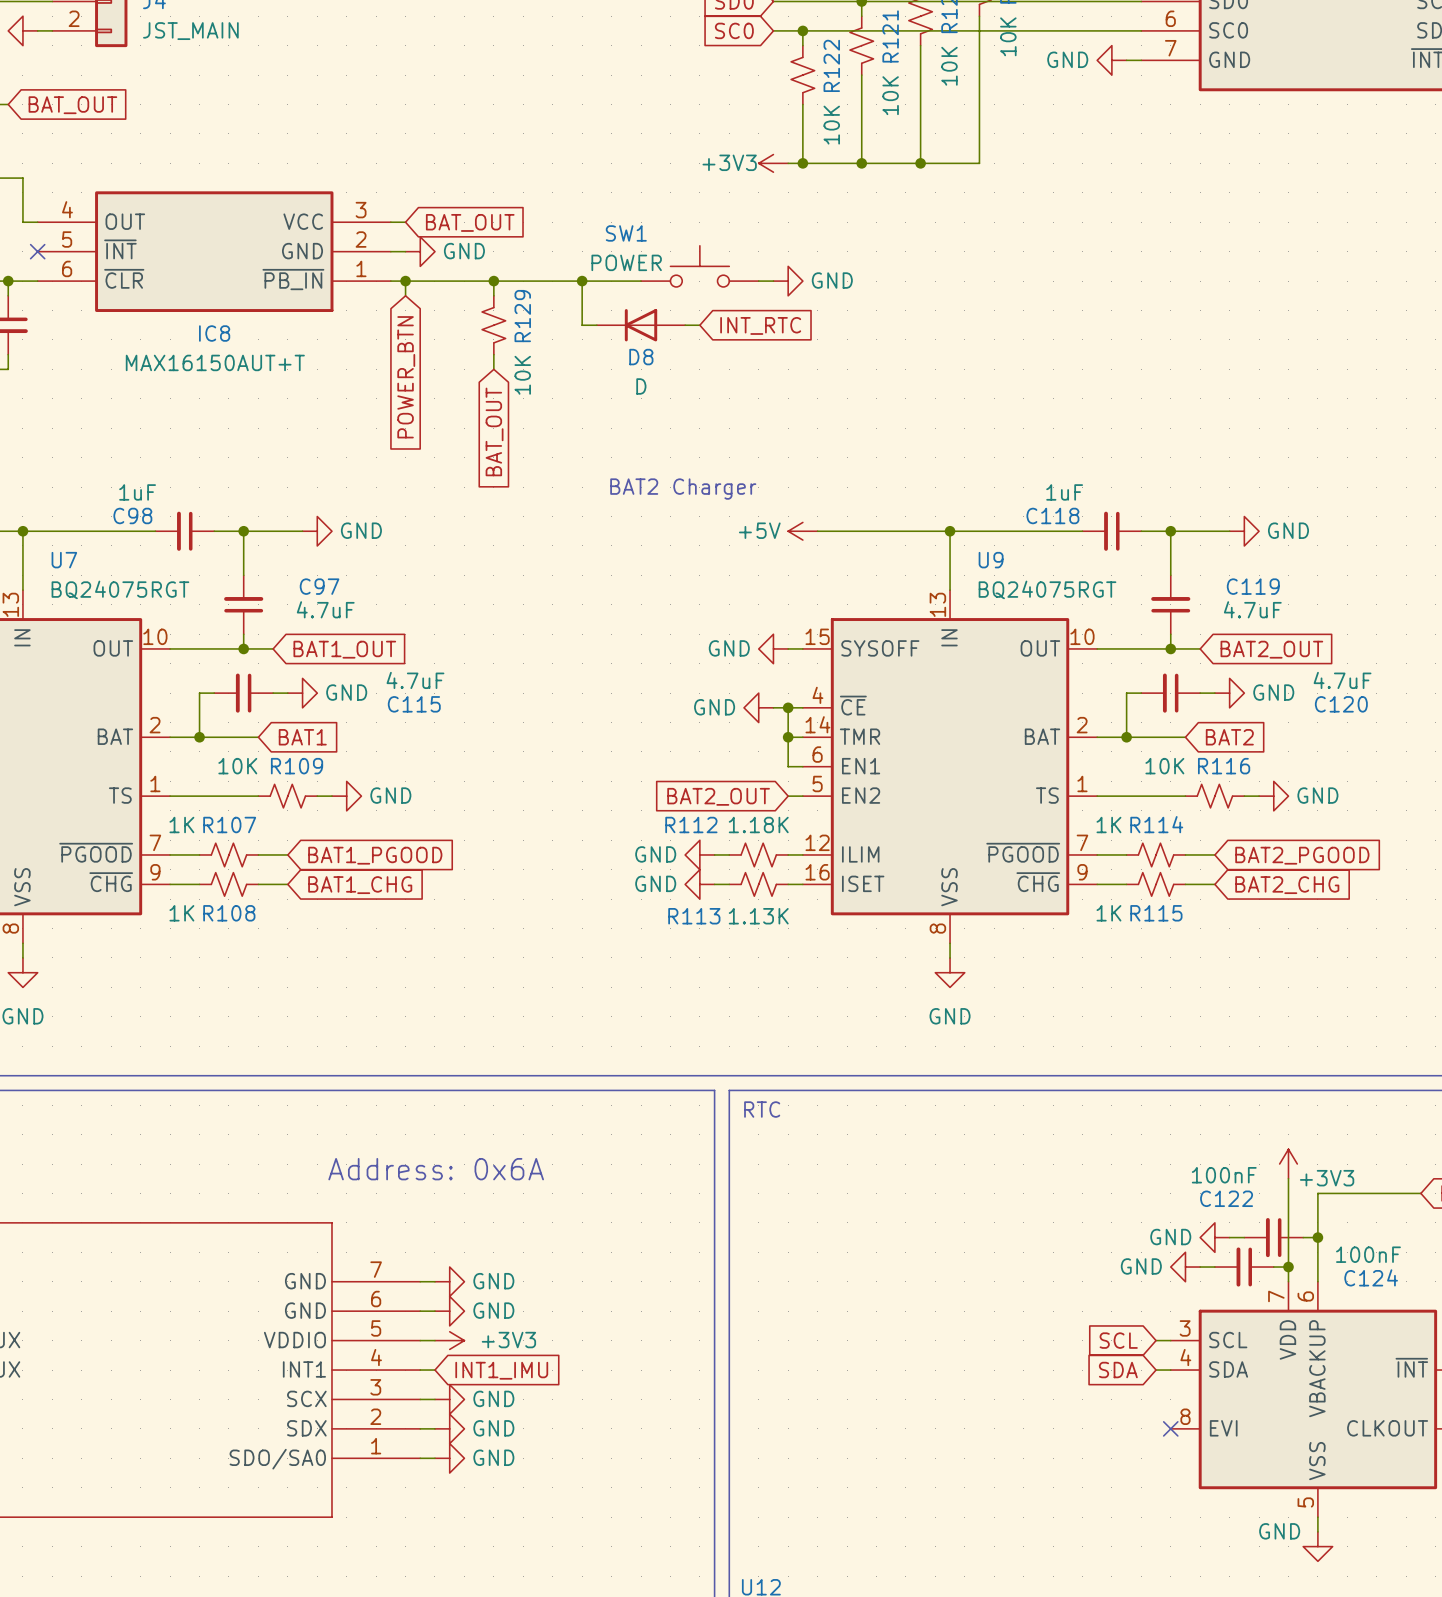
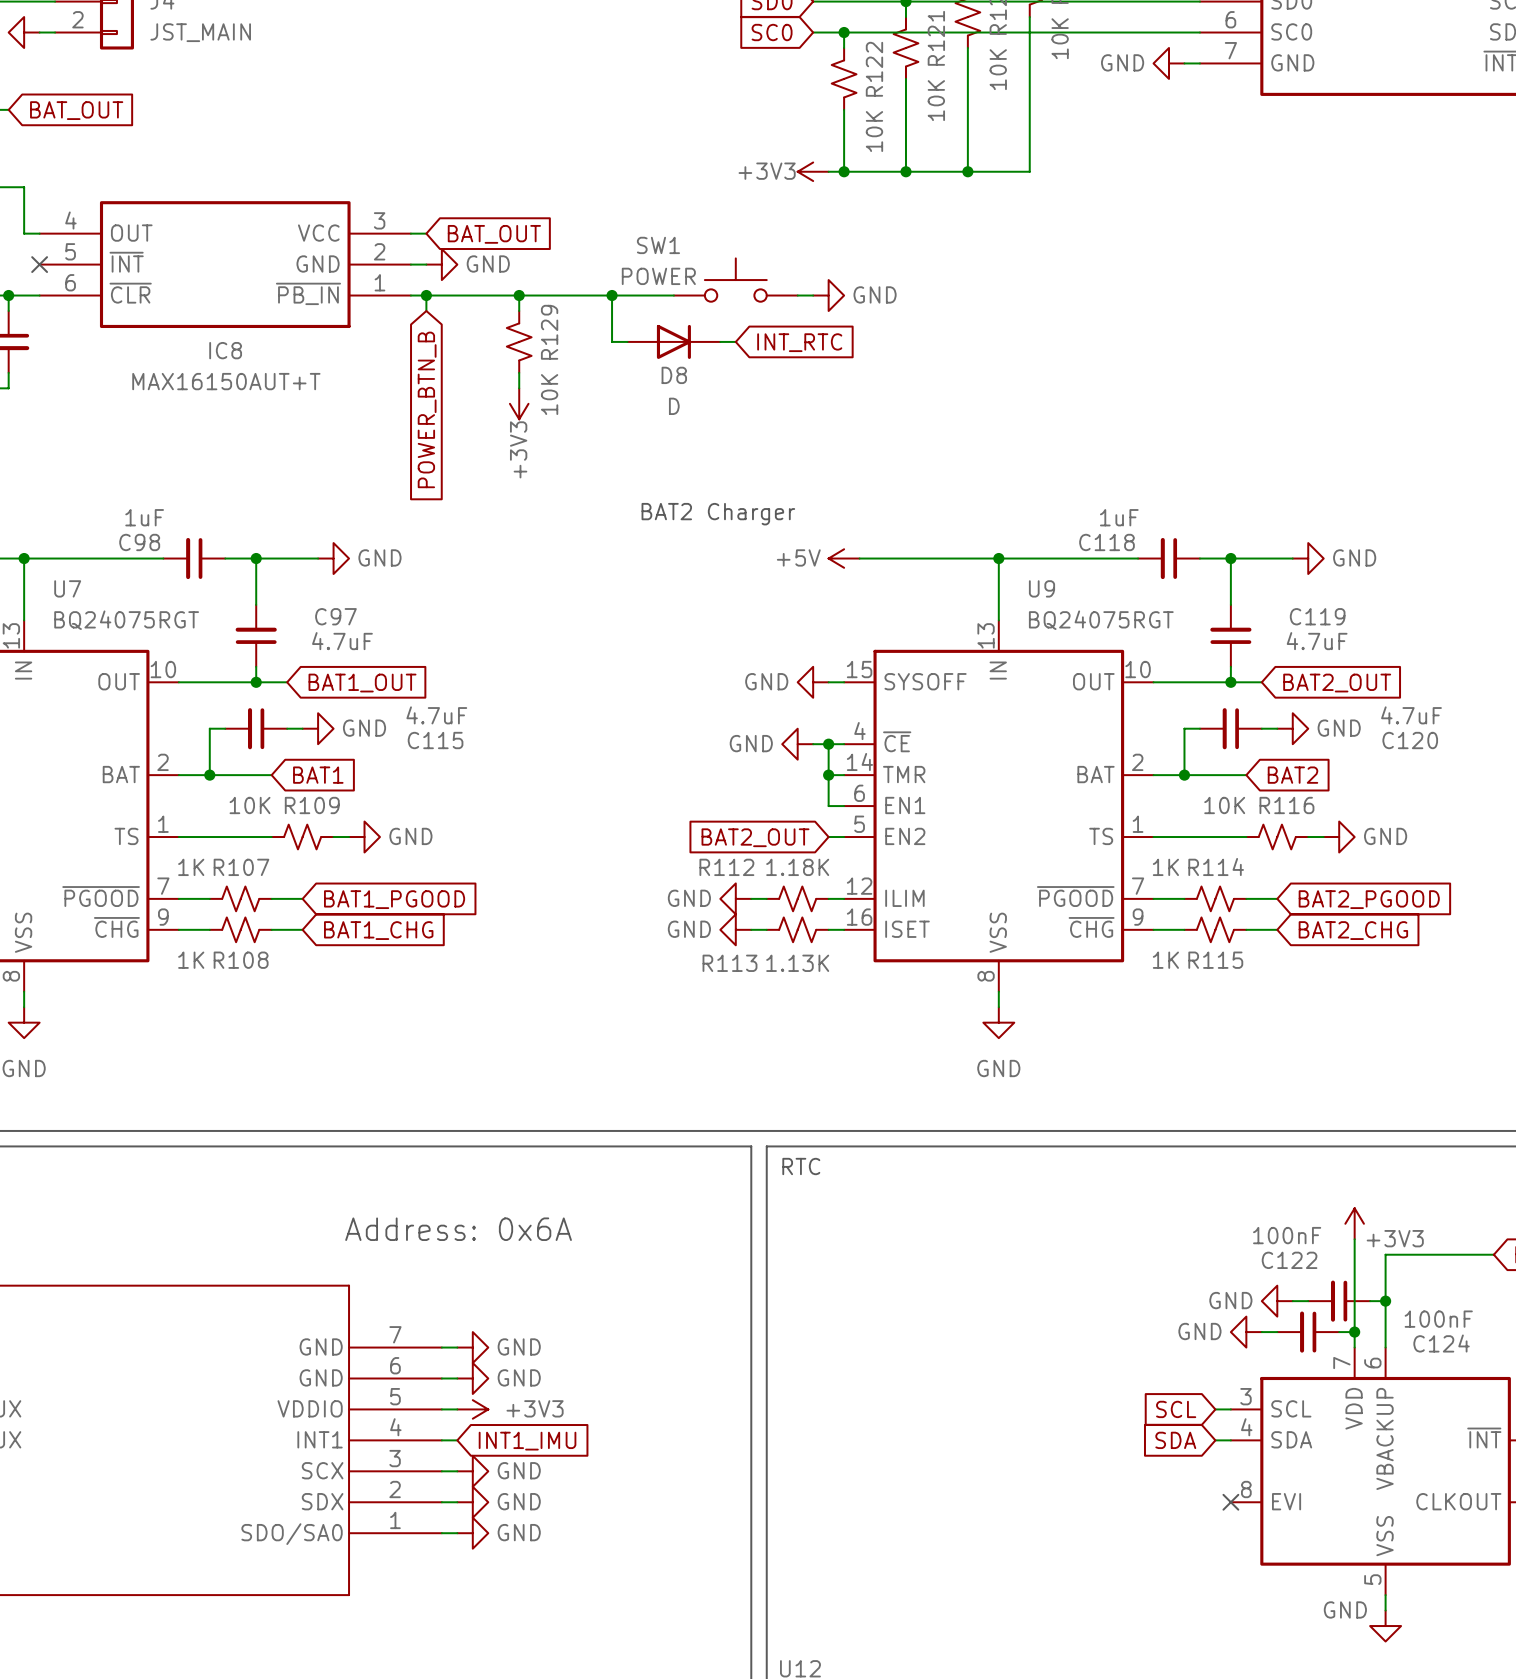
D8 rotation: 0° (641, 325) -> 180° (673, 341)
global label: POWER_BTN (406, 377) -> POWER_BTN_B (427, 409)
power symbol: none -> +3V3 (519, 403)
global label: BAT_OUT (494, 431) -> none

